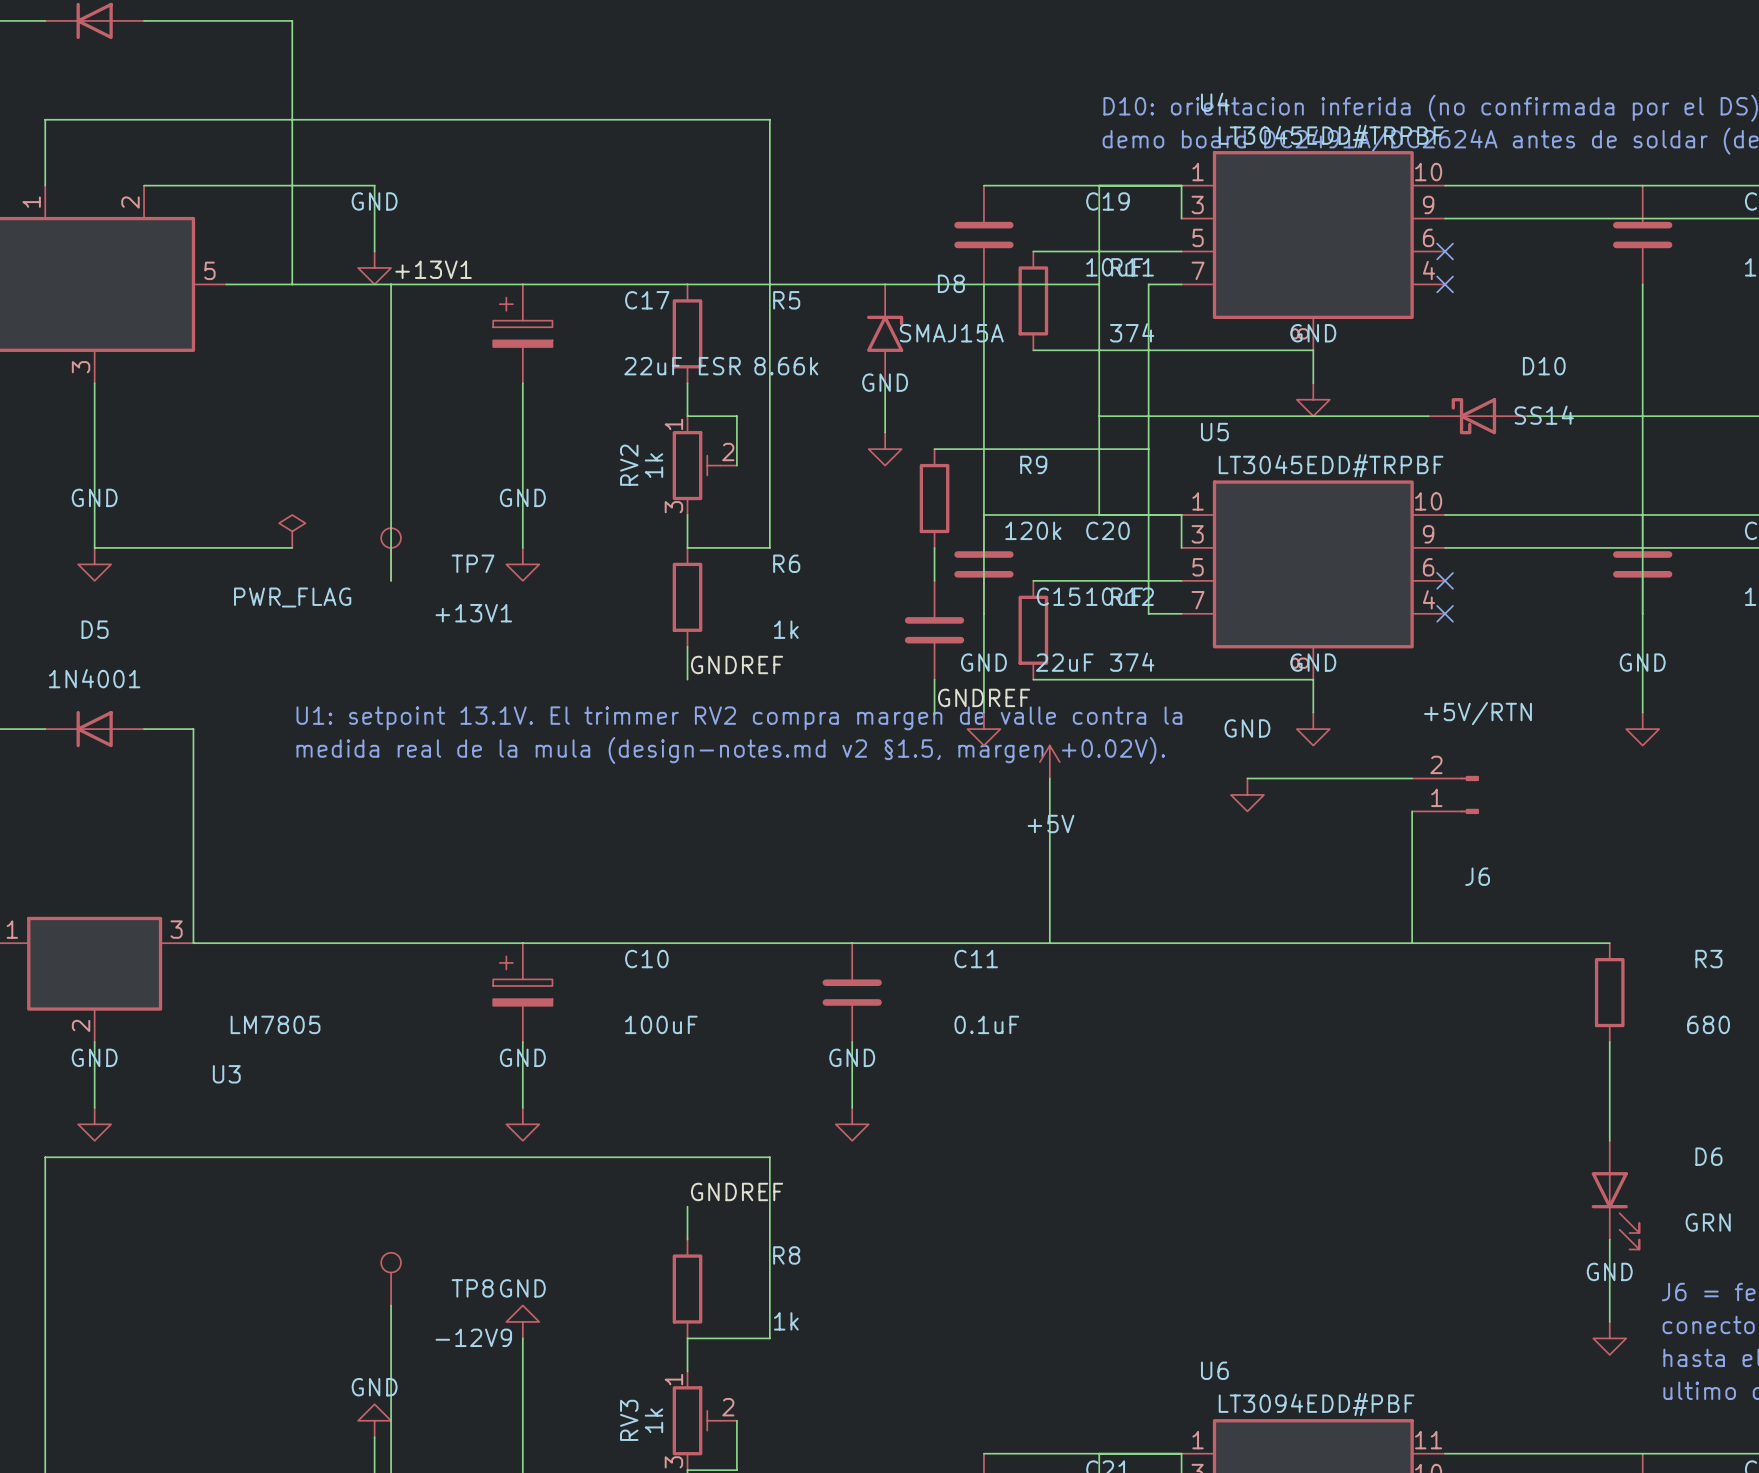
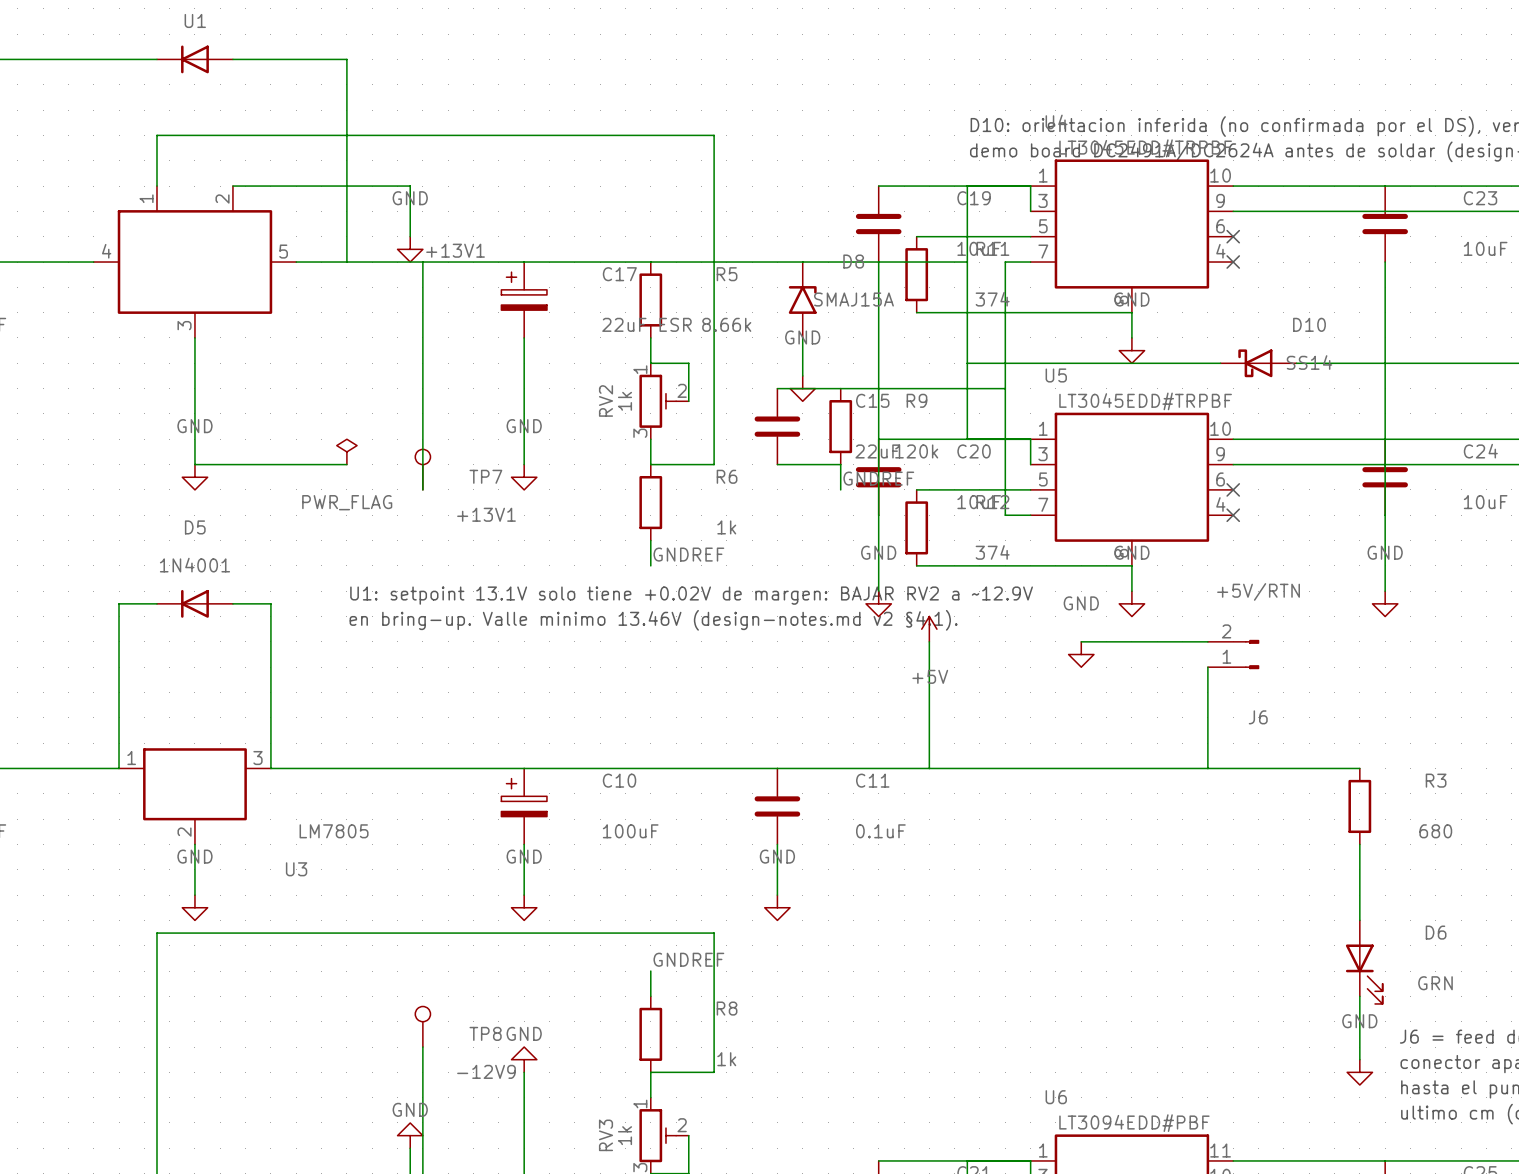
wire: none -> (777, 388) (840, 388)
wire: none -> (777, 464) (840, 464)
C15 position: (934, 630) -> (777, 426)
wire: (934, 679) (934, 712) -> none
label position: GNDREF (984, 697) -> GNDREF (878, 478)
text: U1: setpoint 13.1V. El trimmer RV2 compra margen de valle contra la (739, 718) -> U1: setpoint 13.1V solo tiene +0.02V de margen: BAJAR RV2 a ~12.9V (691, 595)
text: medida real de la mula (design-notes.md v2 §1.5, margen +0.02V). (730, 750) -> en bring-up. Valle minimo 13.46V (design-notes.md v2 §4.1). (653, 620)

